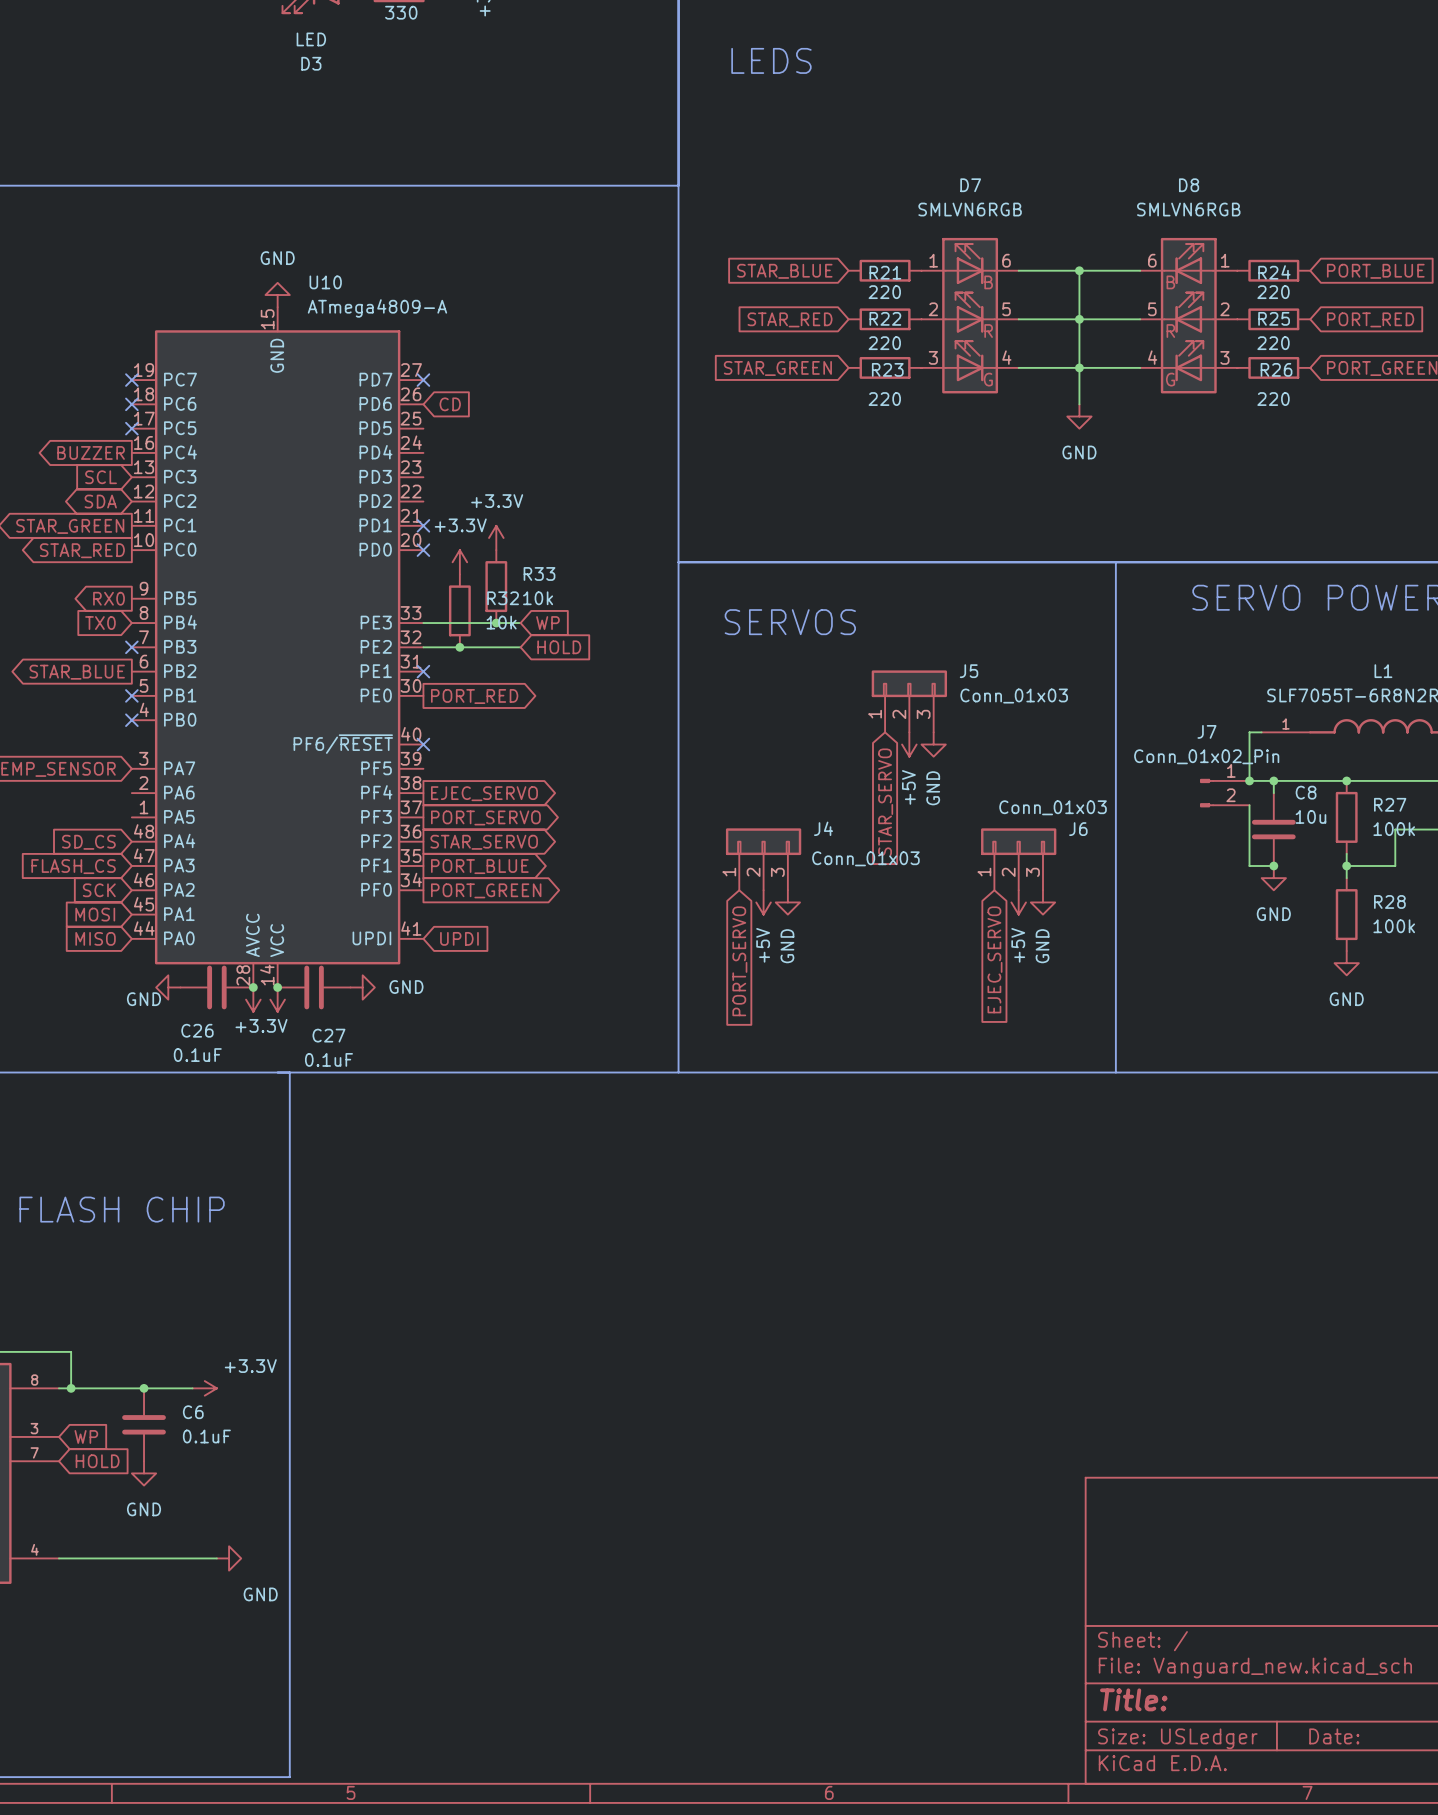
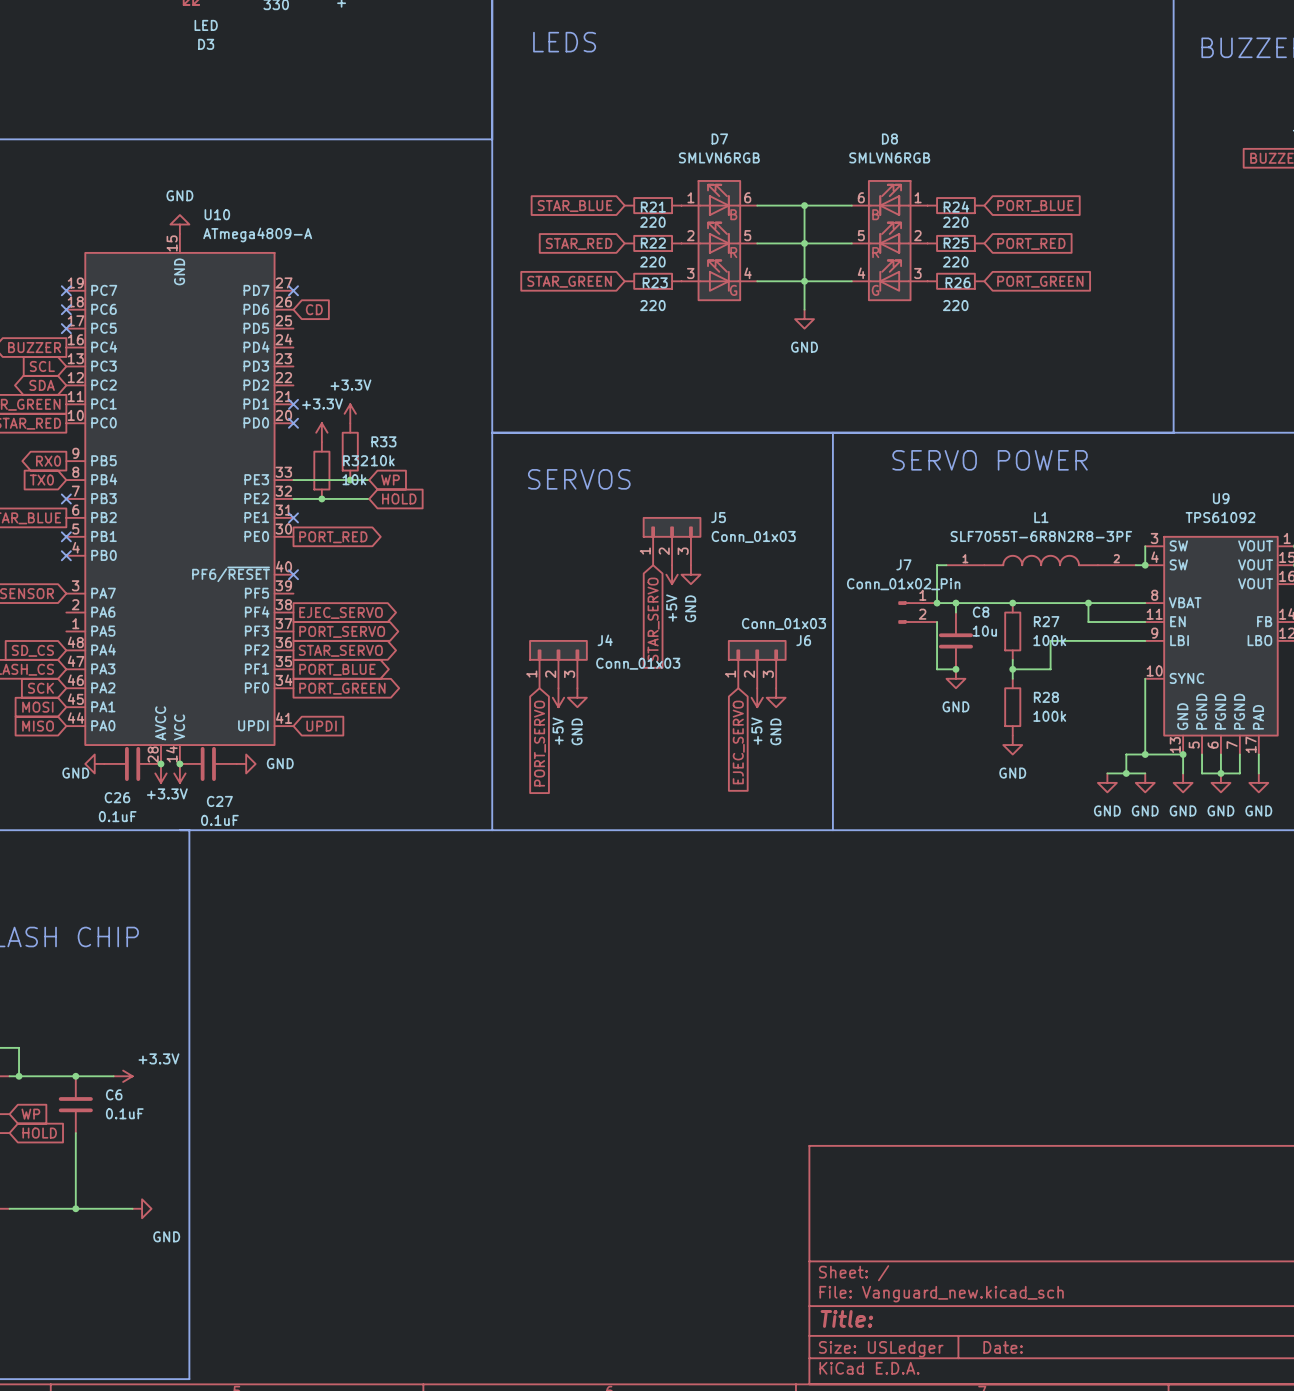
wire: none -> (75, 1133) (75, 1208)
power symbol: GND (144, 1473) -> none
junction: none -> (75, 1208)

